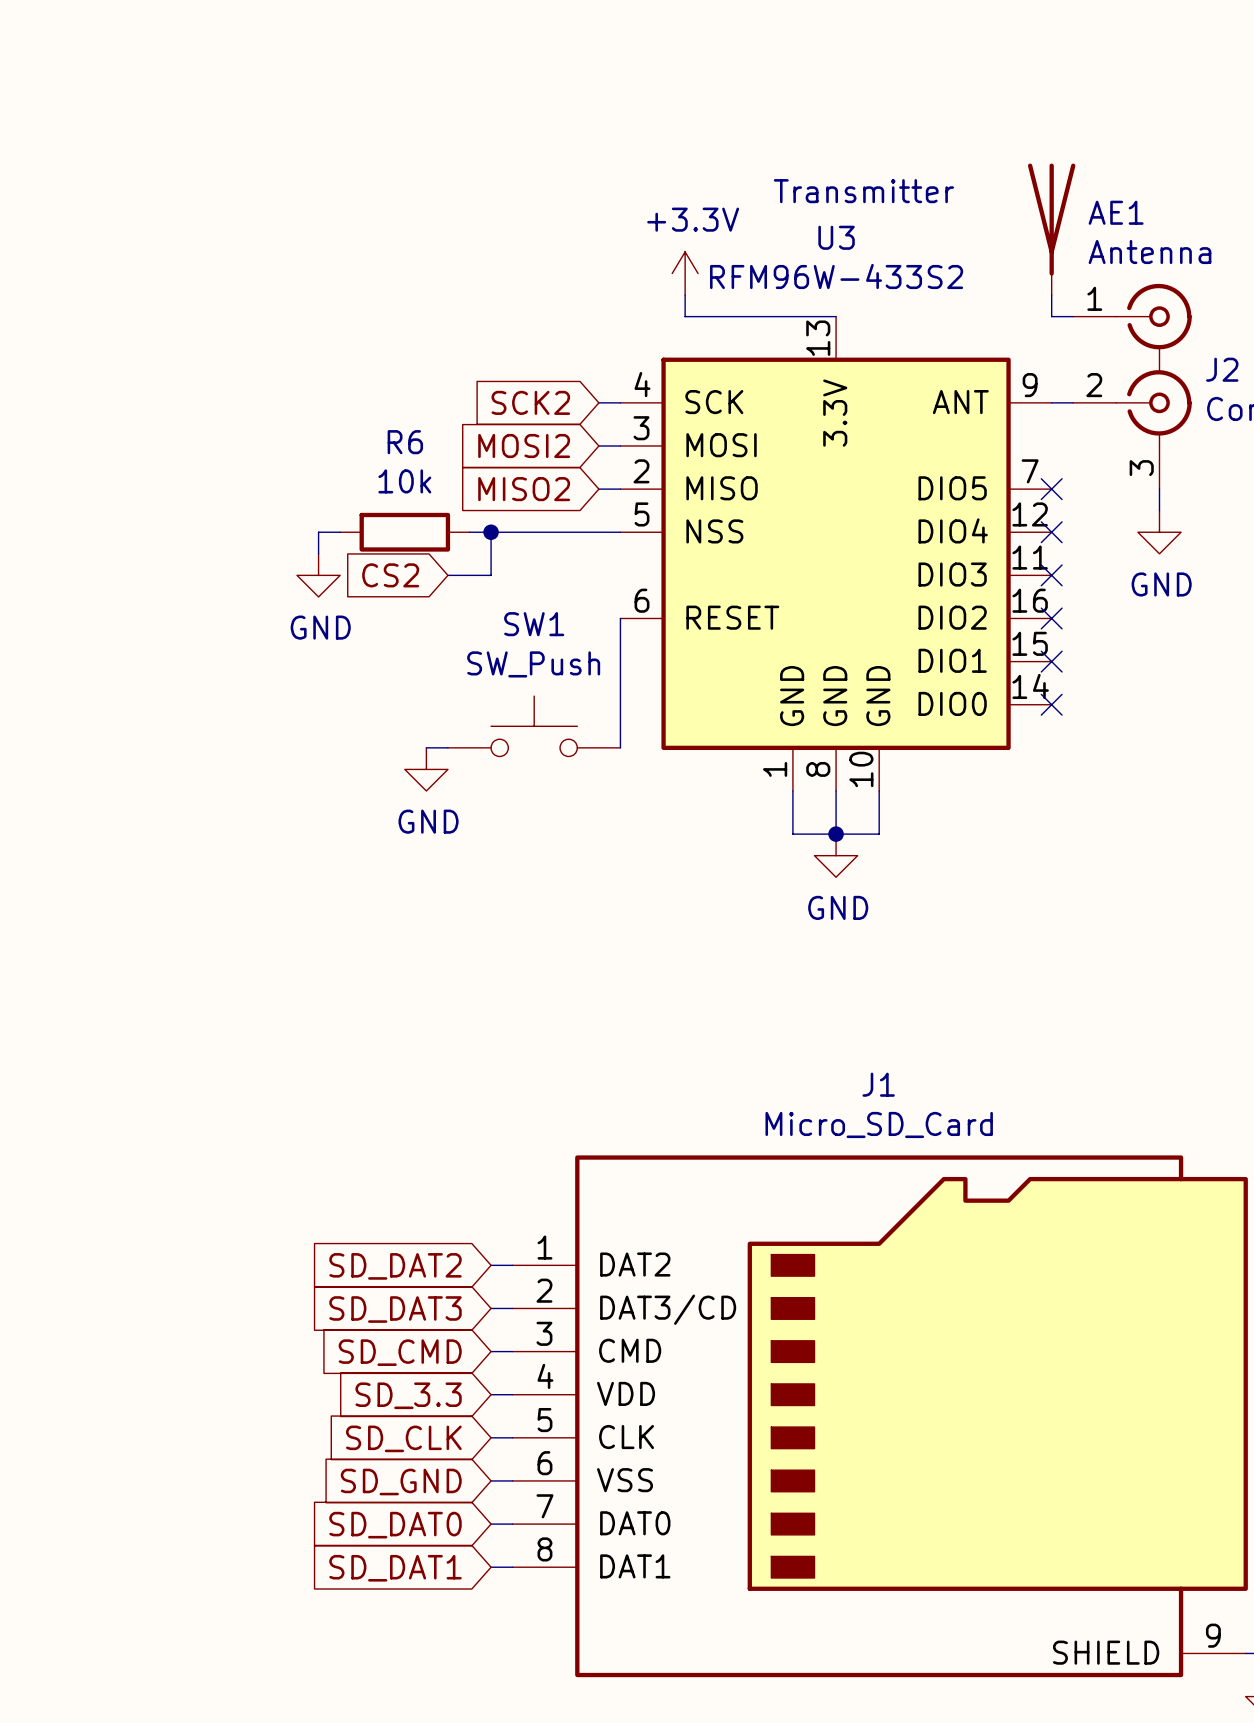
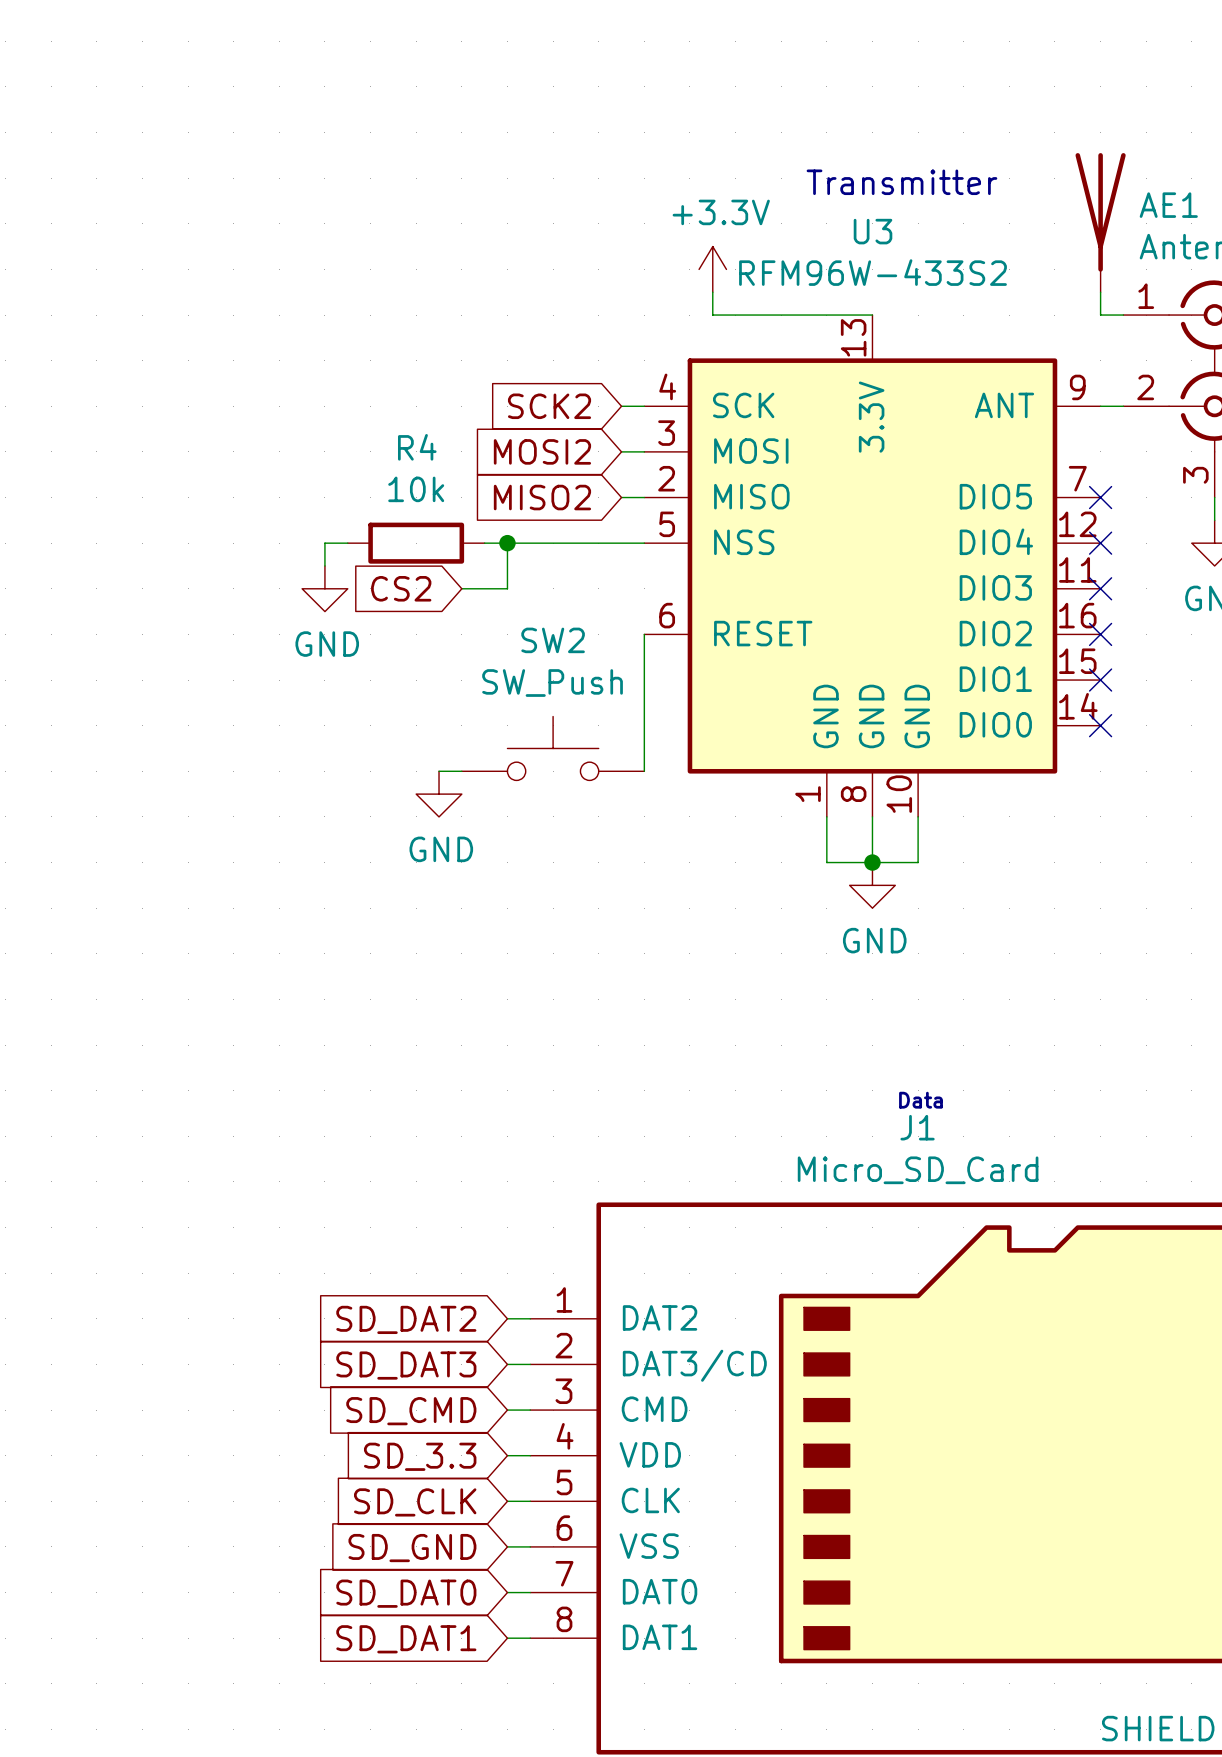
R6 name: R6 (405, 442) -> R4 (417, 447)
SW1 name: SW1 (534, 624) -> SW2 (553, 640)
text: none -> Data (920, 1100)

